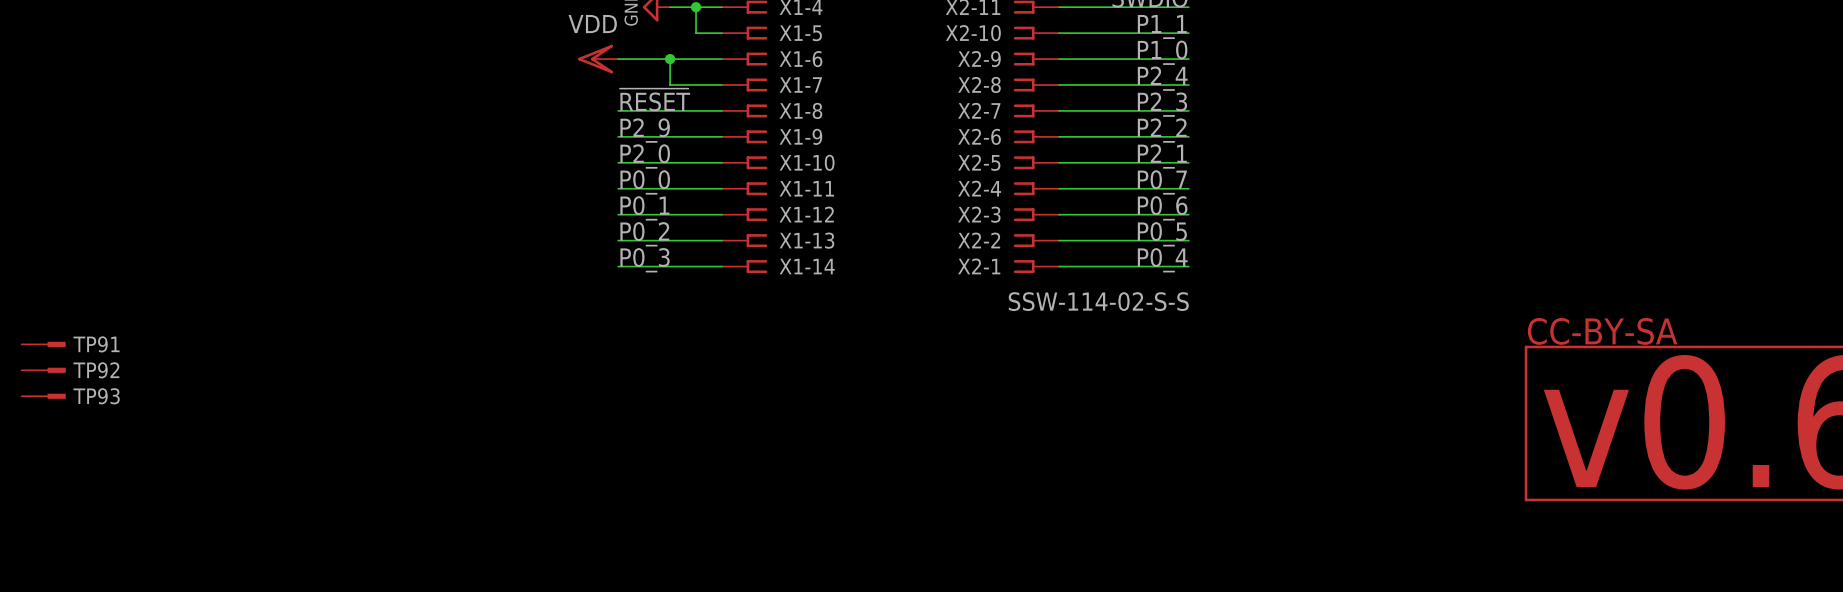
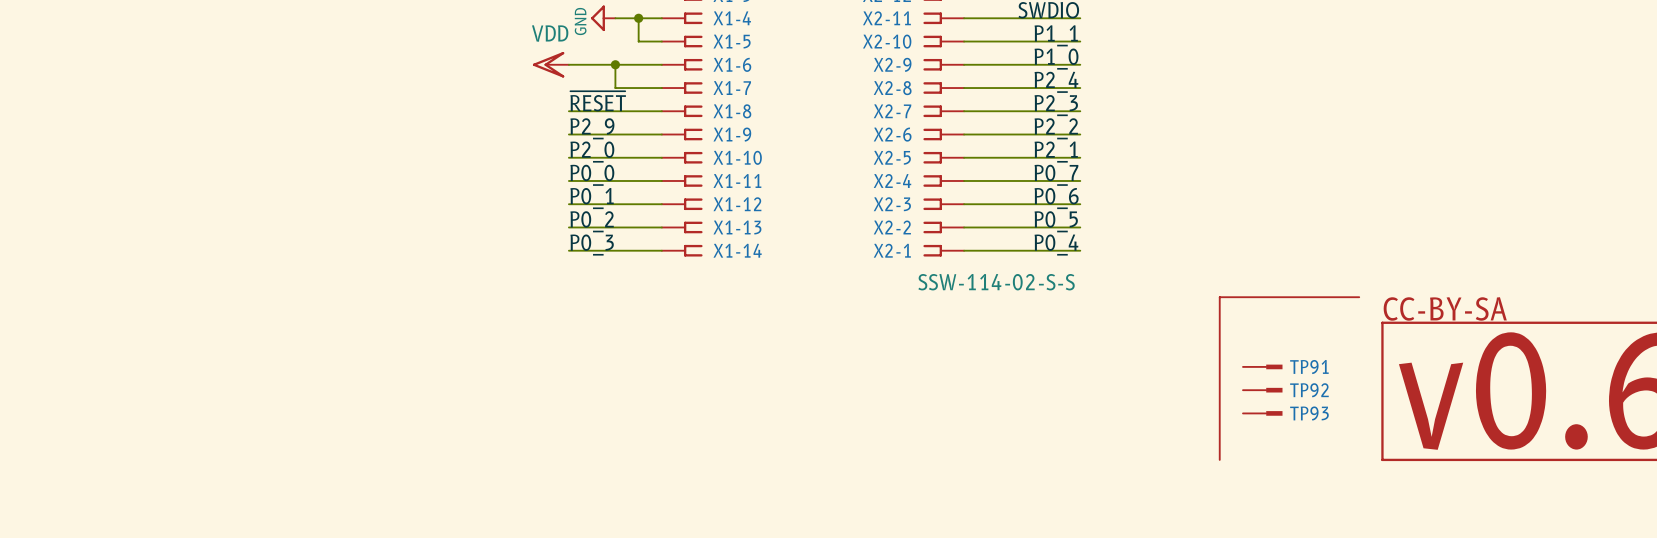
line: none -> (1359, 297) (1219, 297) (1219, 459)
TP91 position: (43, 344) -> (1262, 366)
TP92 position: (43, 370) -> (1262, 390)
TP93 position: (43, 396) -> (1262, 413)

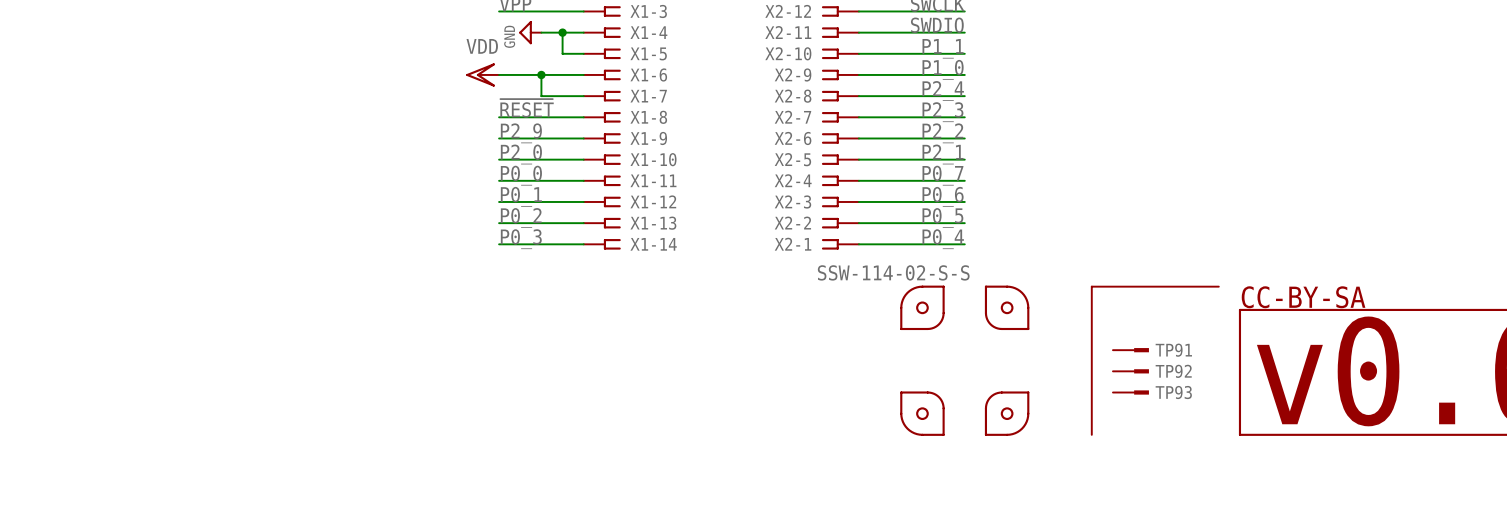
part: none -> (922, 307)
part: none -> (1007, 307)
part: none -> (922, 413)
part: none -> (1007, 413)

